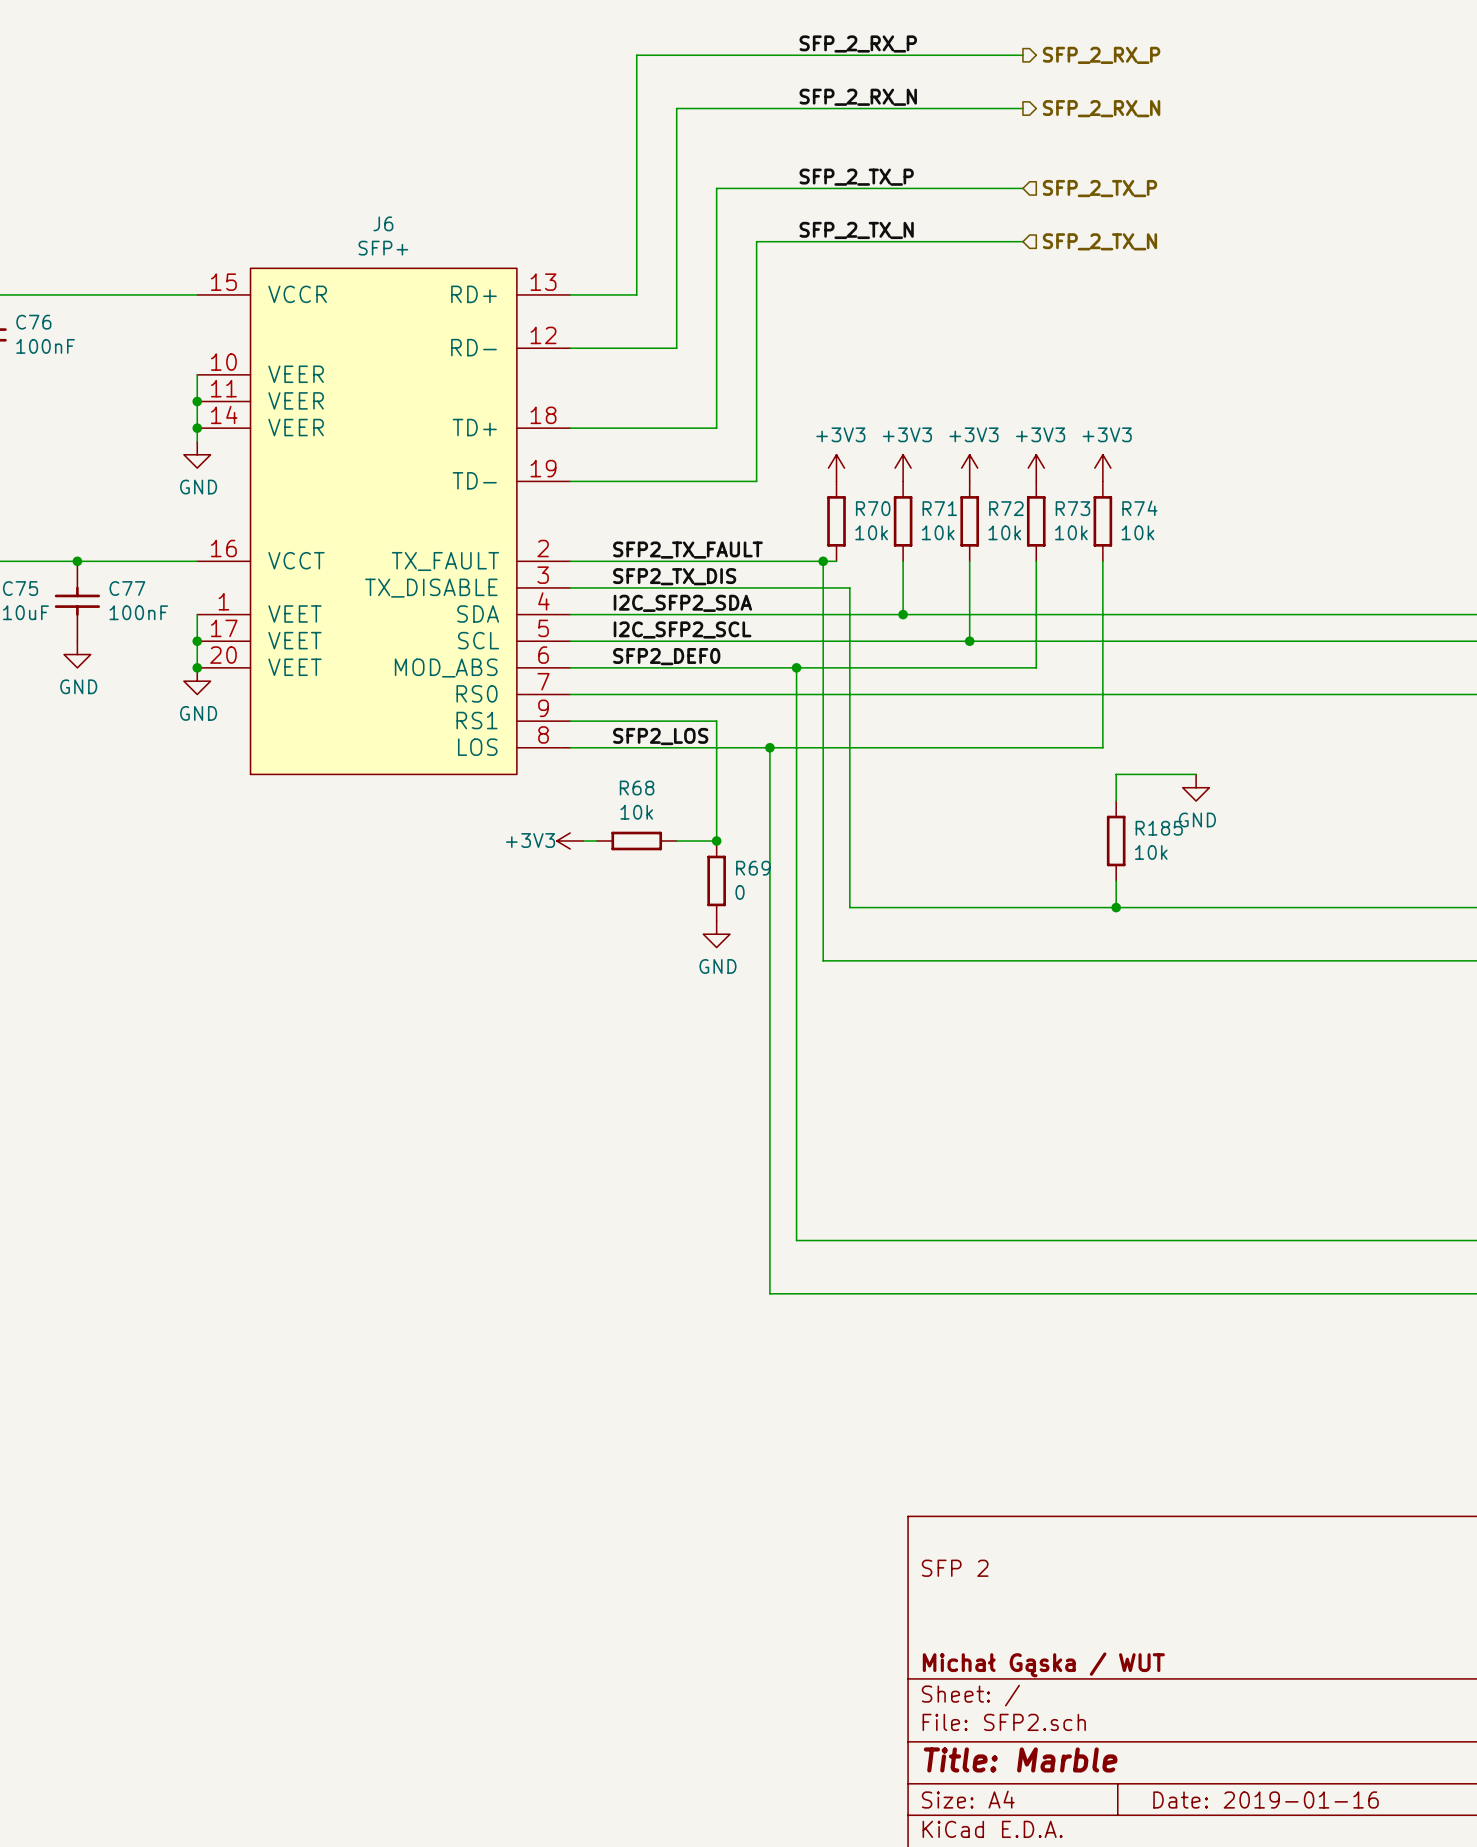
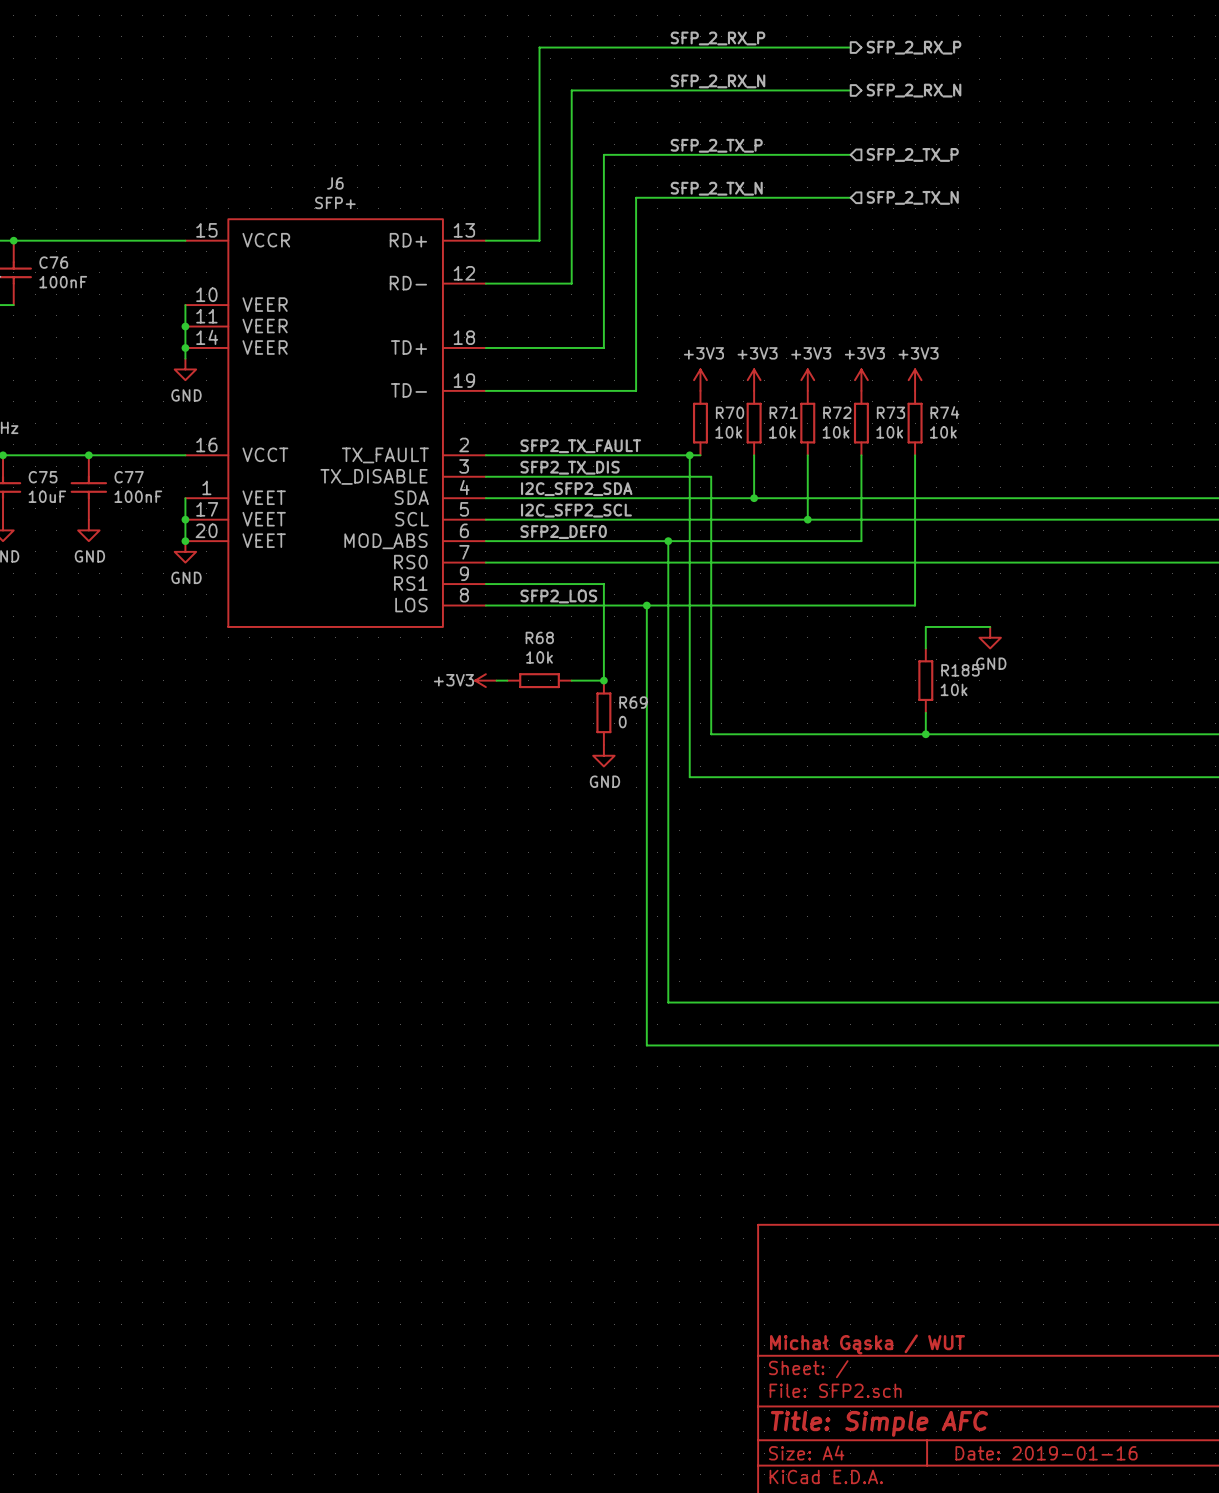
title block: SFP 2 (955, 1568) -> none
title block: Title: Marble (1020, 1759) -> Title: Simple AFC (879, 1423)

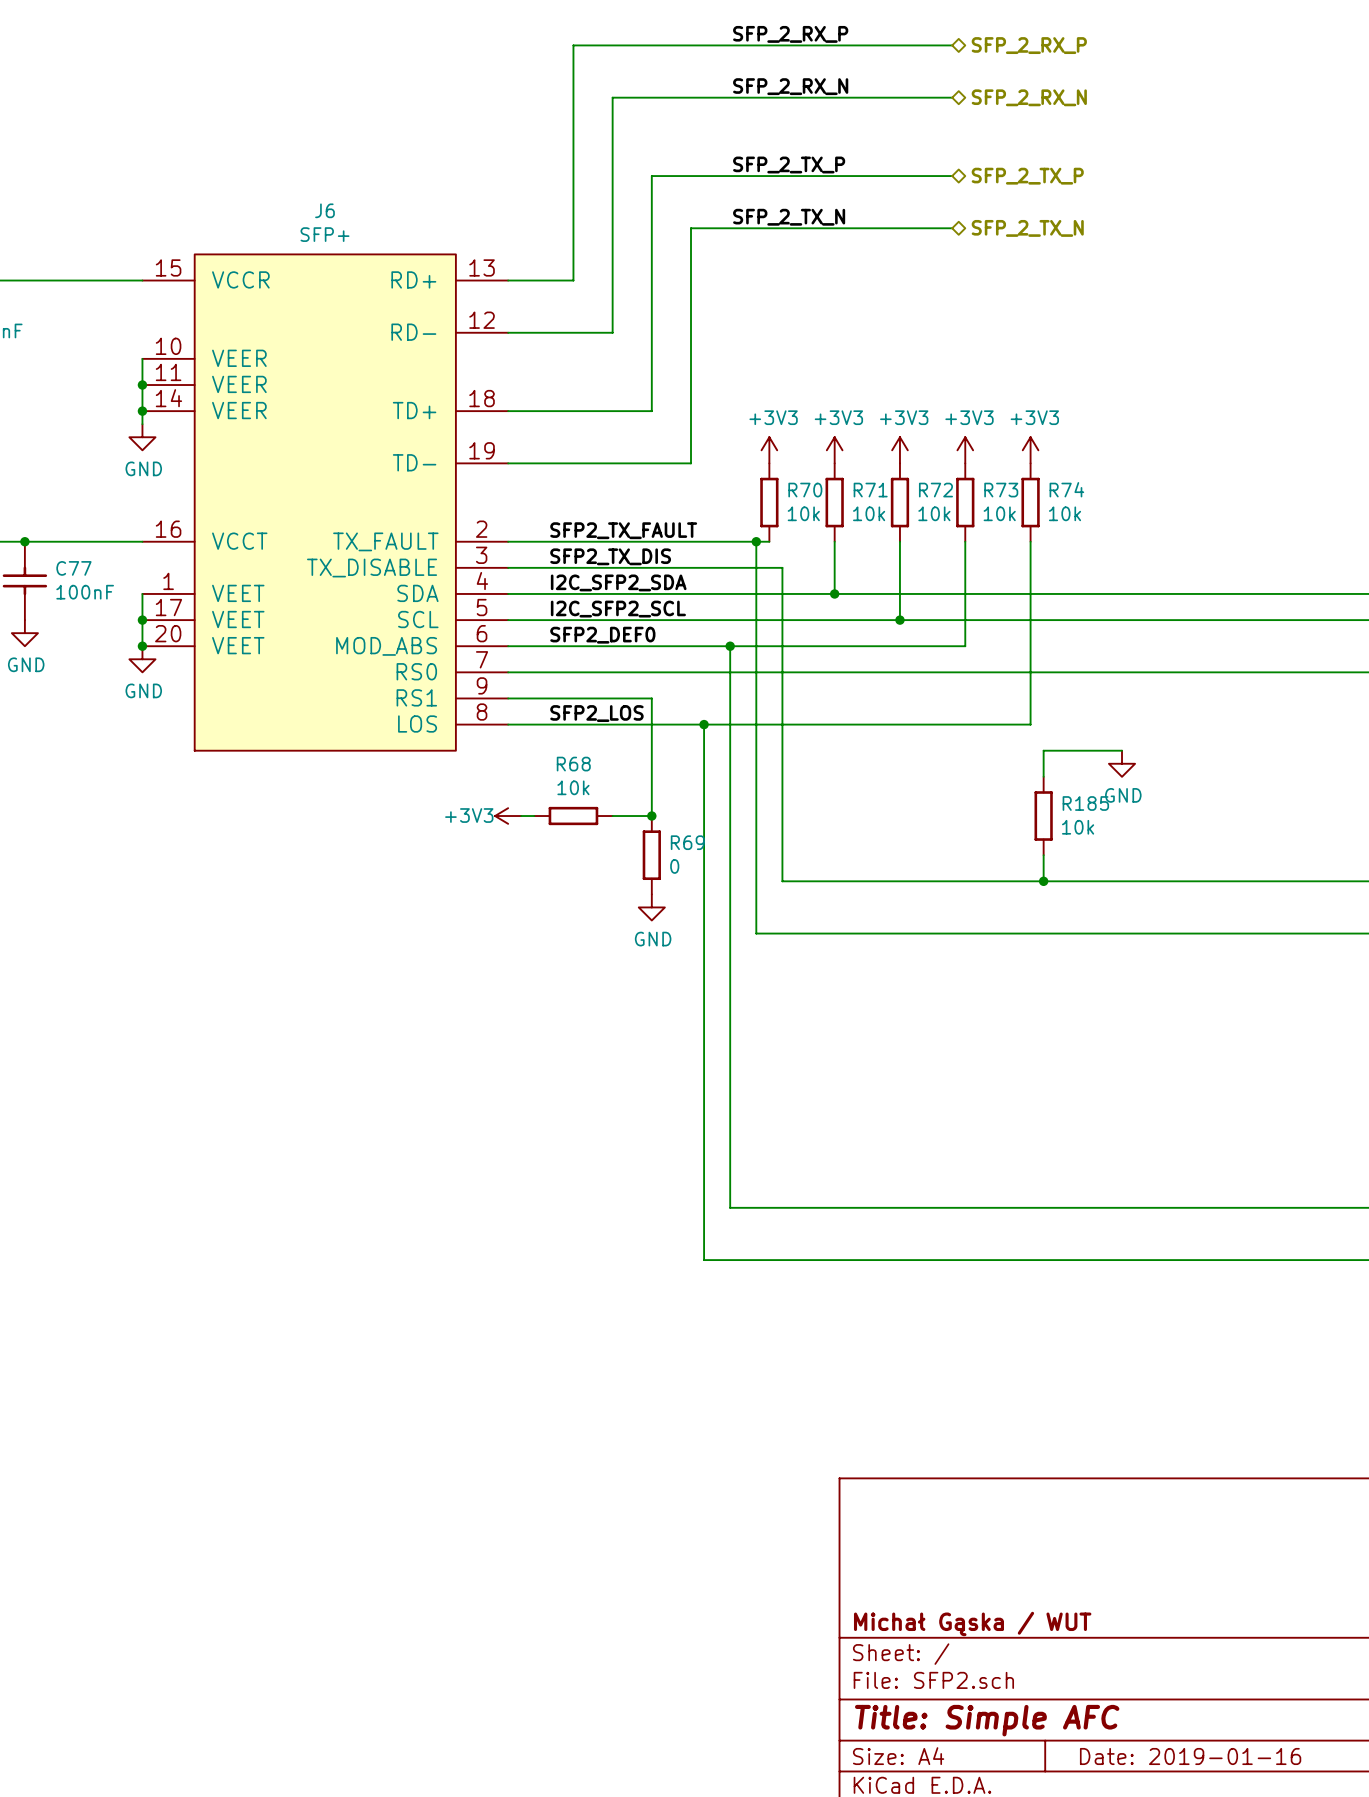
hierarchical label shape: output (914, 47) -> bidirectional (1029, 45)
hierarchical label shape: output (914, 90) -> bidirectional (1029, 97)
hierarchical label shape: input (912, 154) -> bidirectional (1027, 176)
hierarchical label shape: input (912, 197) -> bidirectional (1027, 228)

